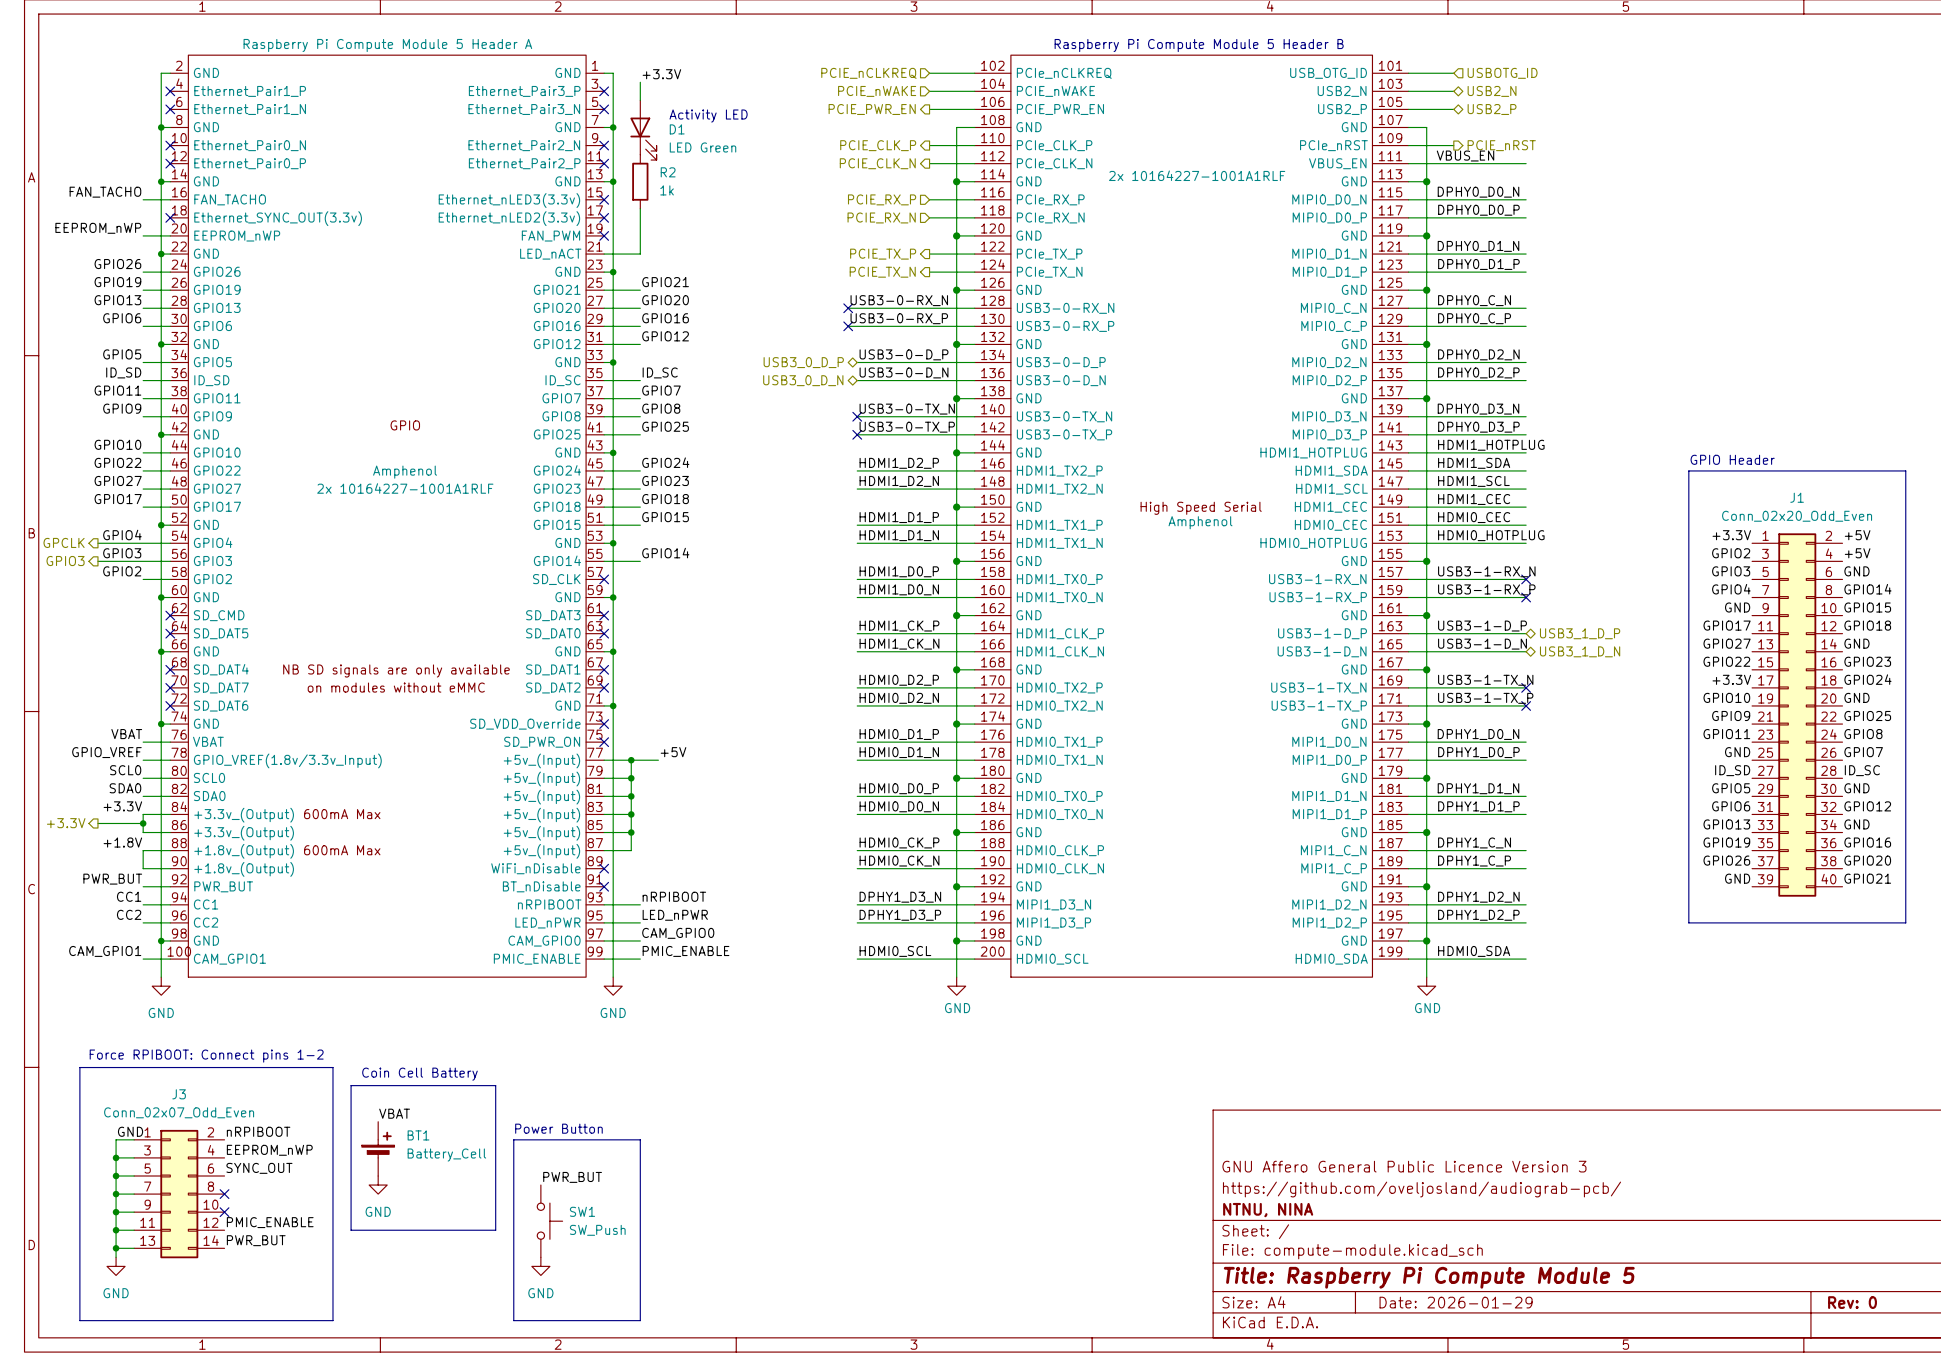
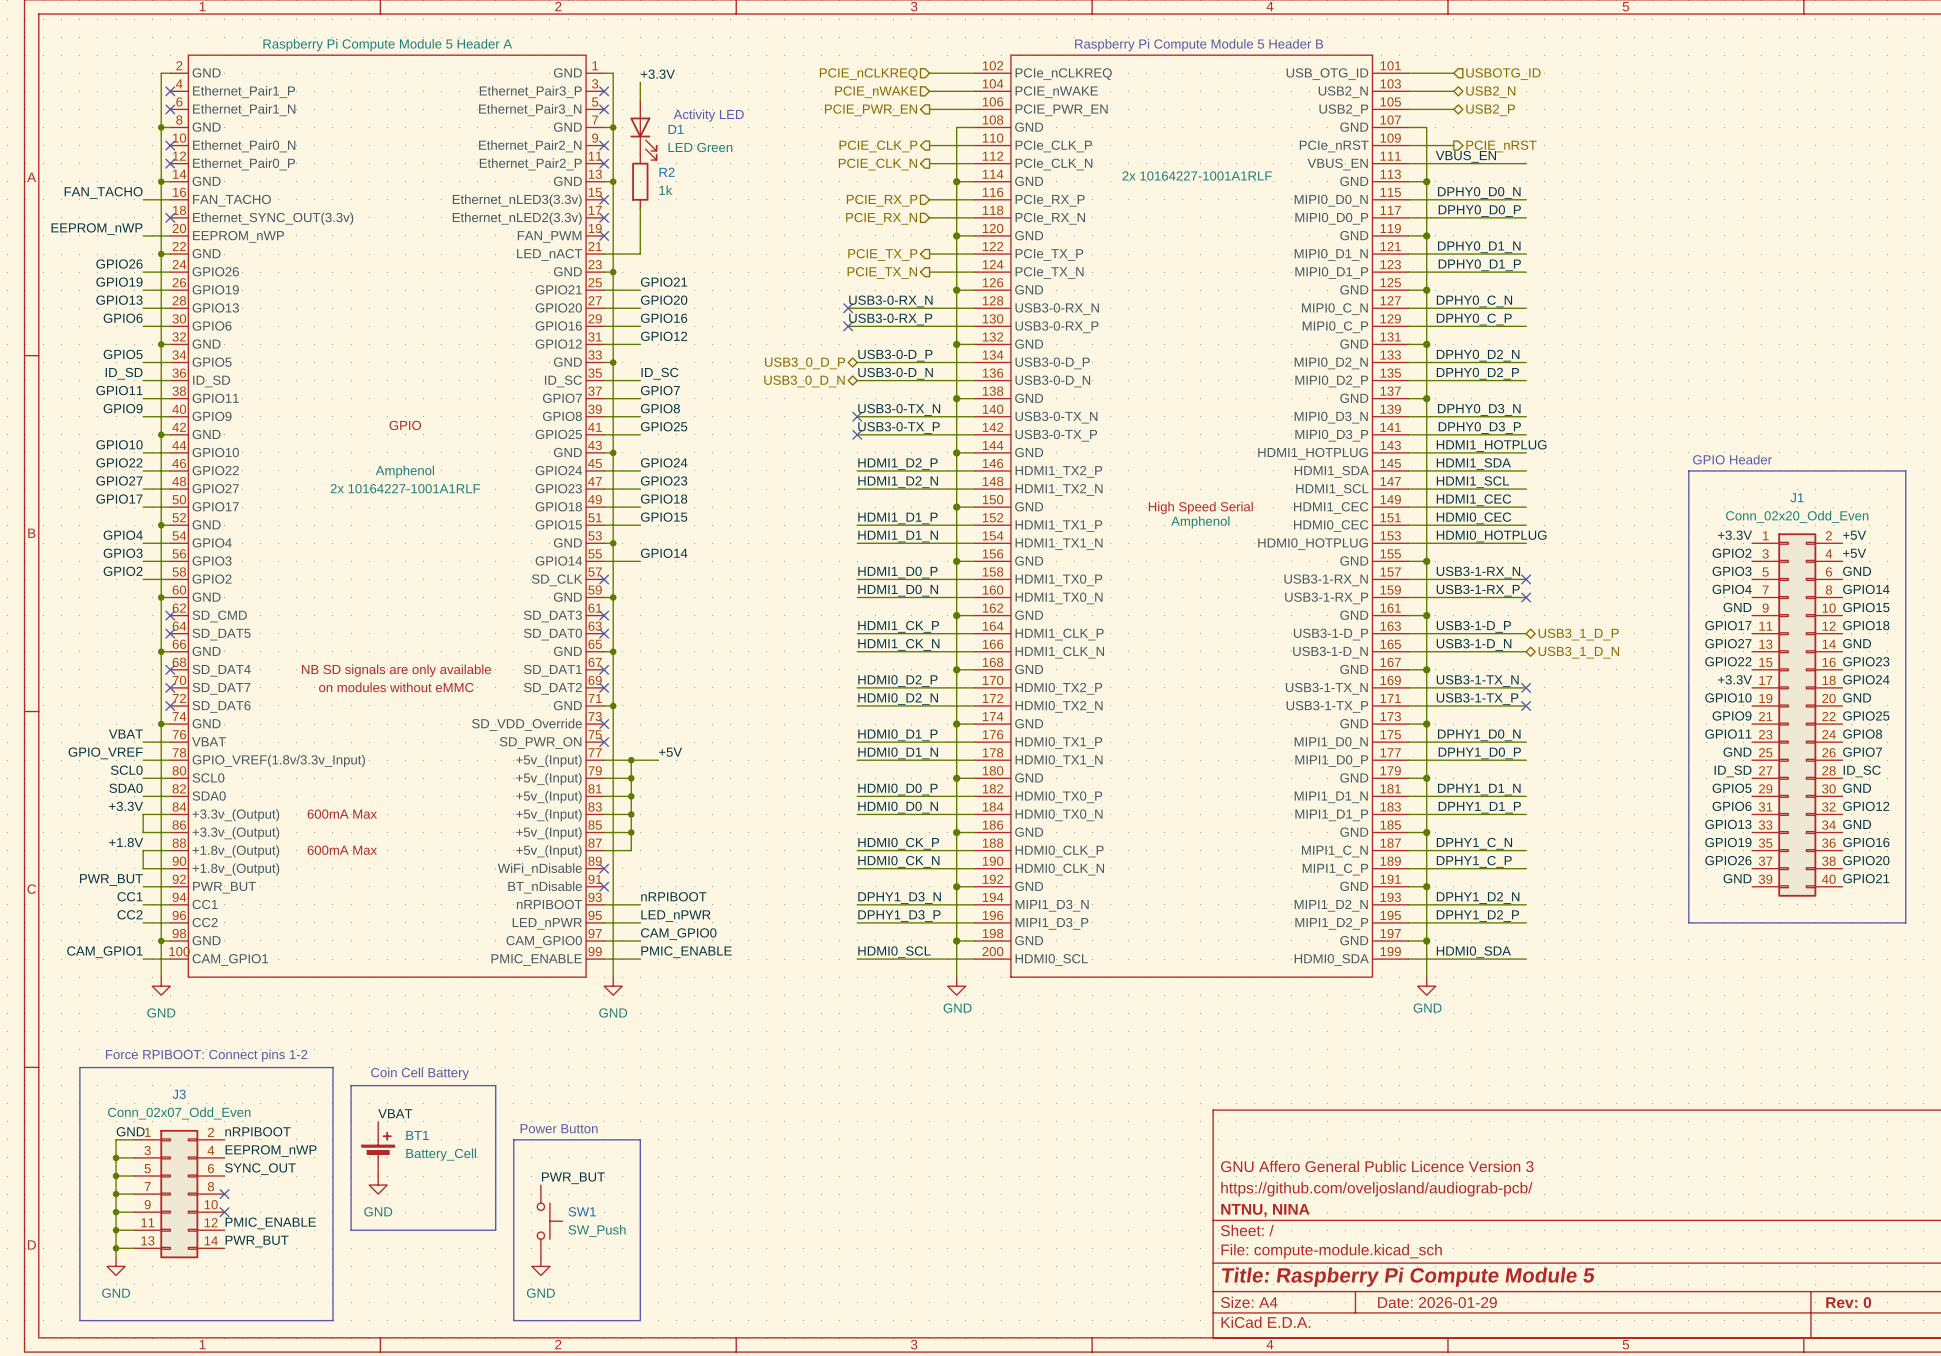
hierarchical label: GPCLK (64, 542) -> none
wire: (97, 543) (143, 543) -> none
hierarchical label: GPIO3 (65, 561) -> none
wire: (97, 561) (143, 561) -> none
hierarchical label: +3.3V (66, 823) -> none
wire: (97, 823) (143, 823) -> none
junction: (143, 823) -> none

